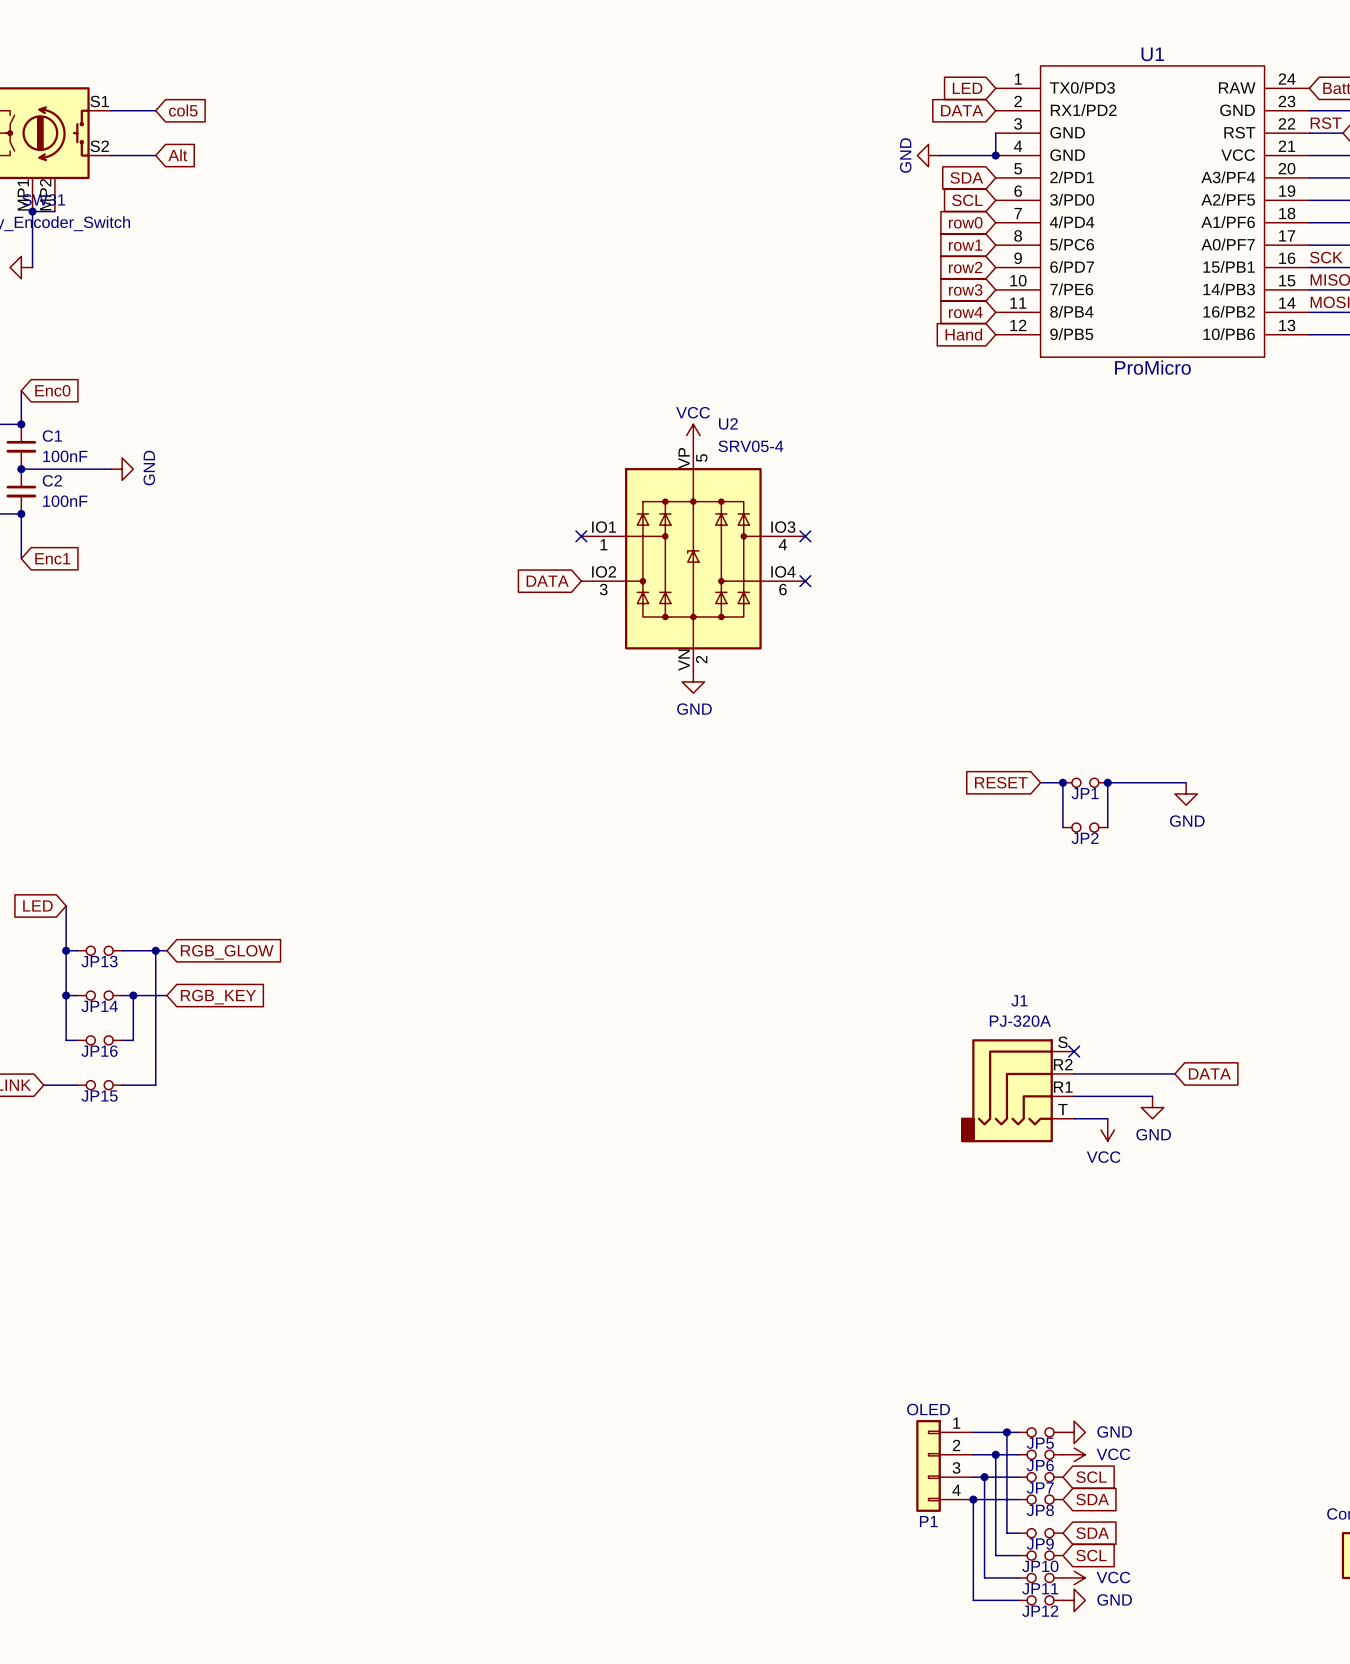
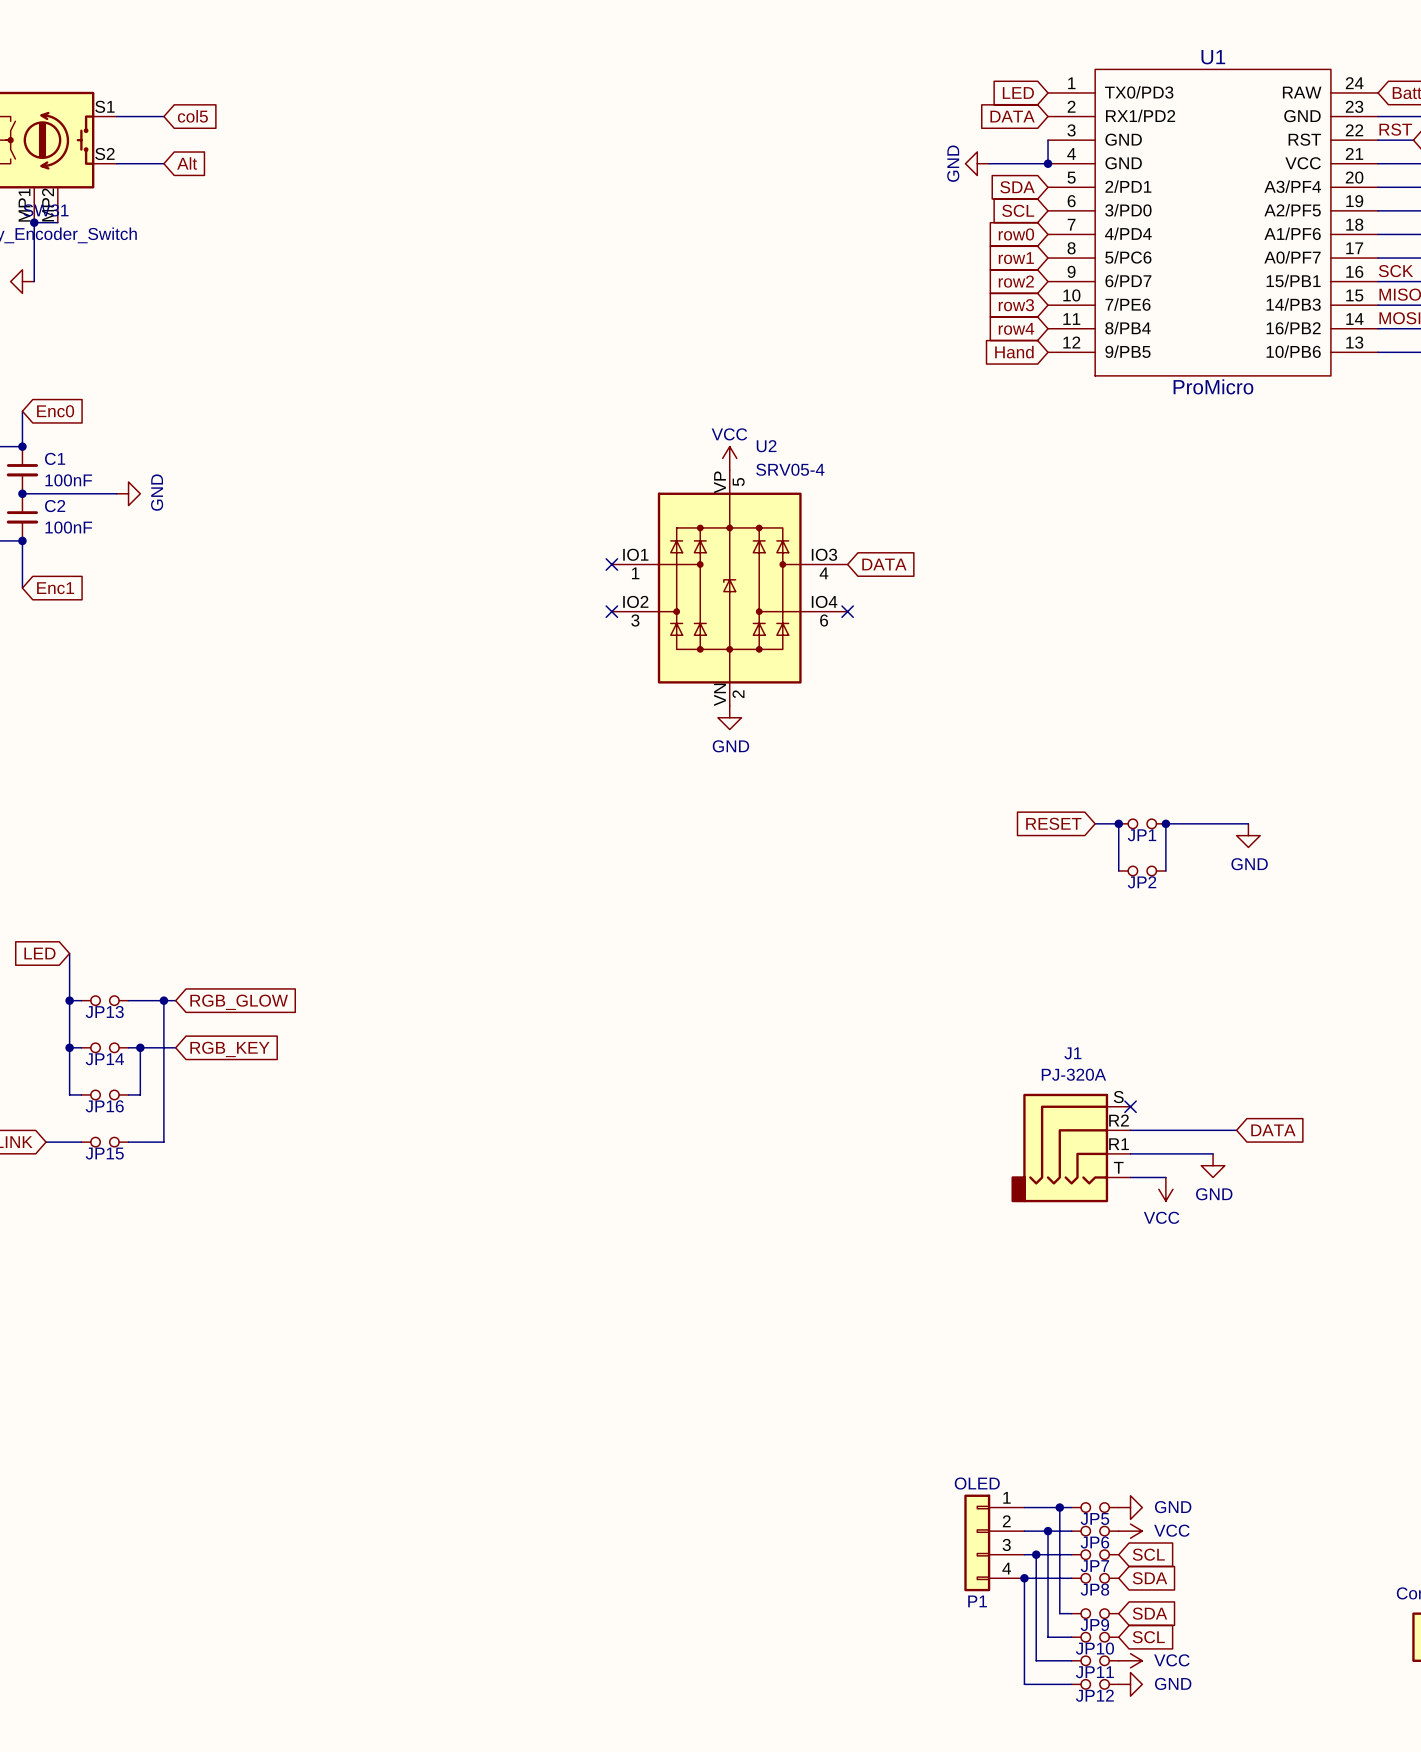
no-connect mark: (805, 536) -> none
global label: none -> DATA (884, 564)
global label: DATA (547, 581) -> none
no-connect mark: none -> (611, 611)

